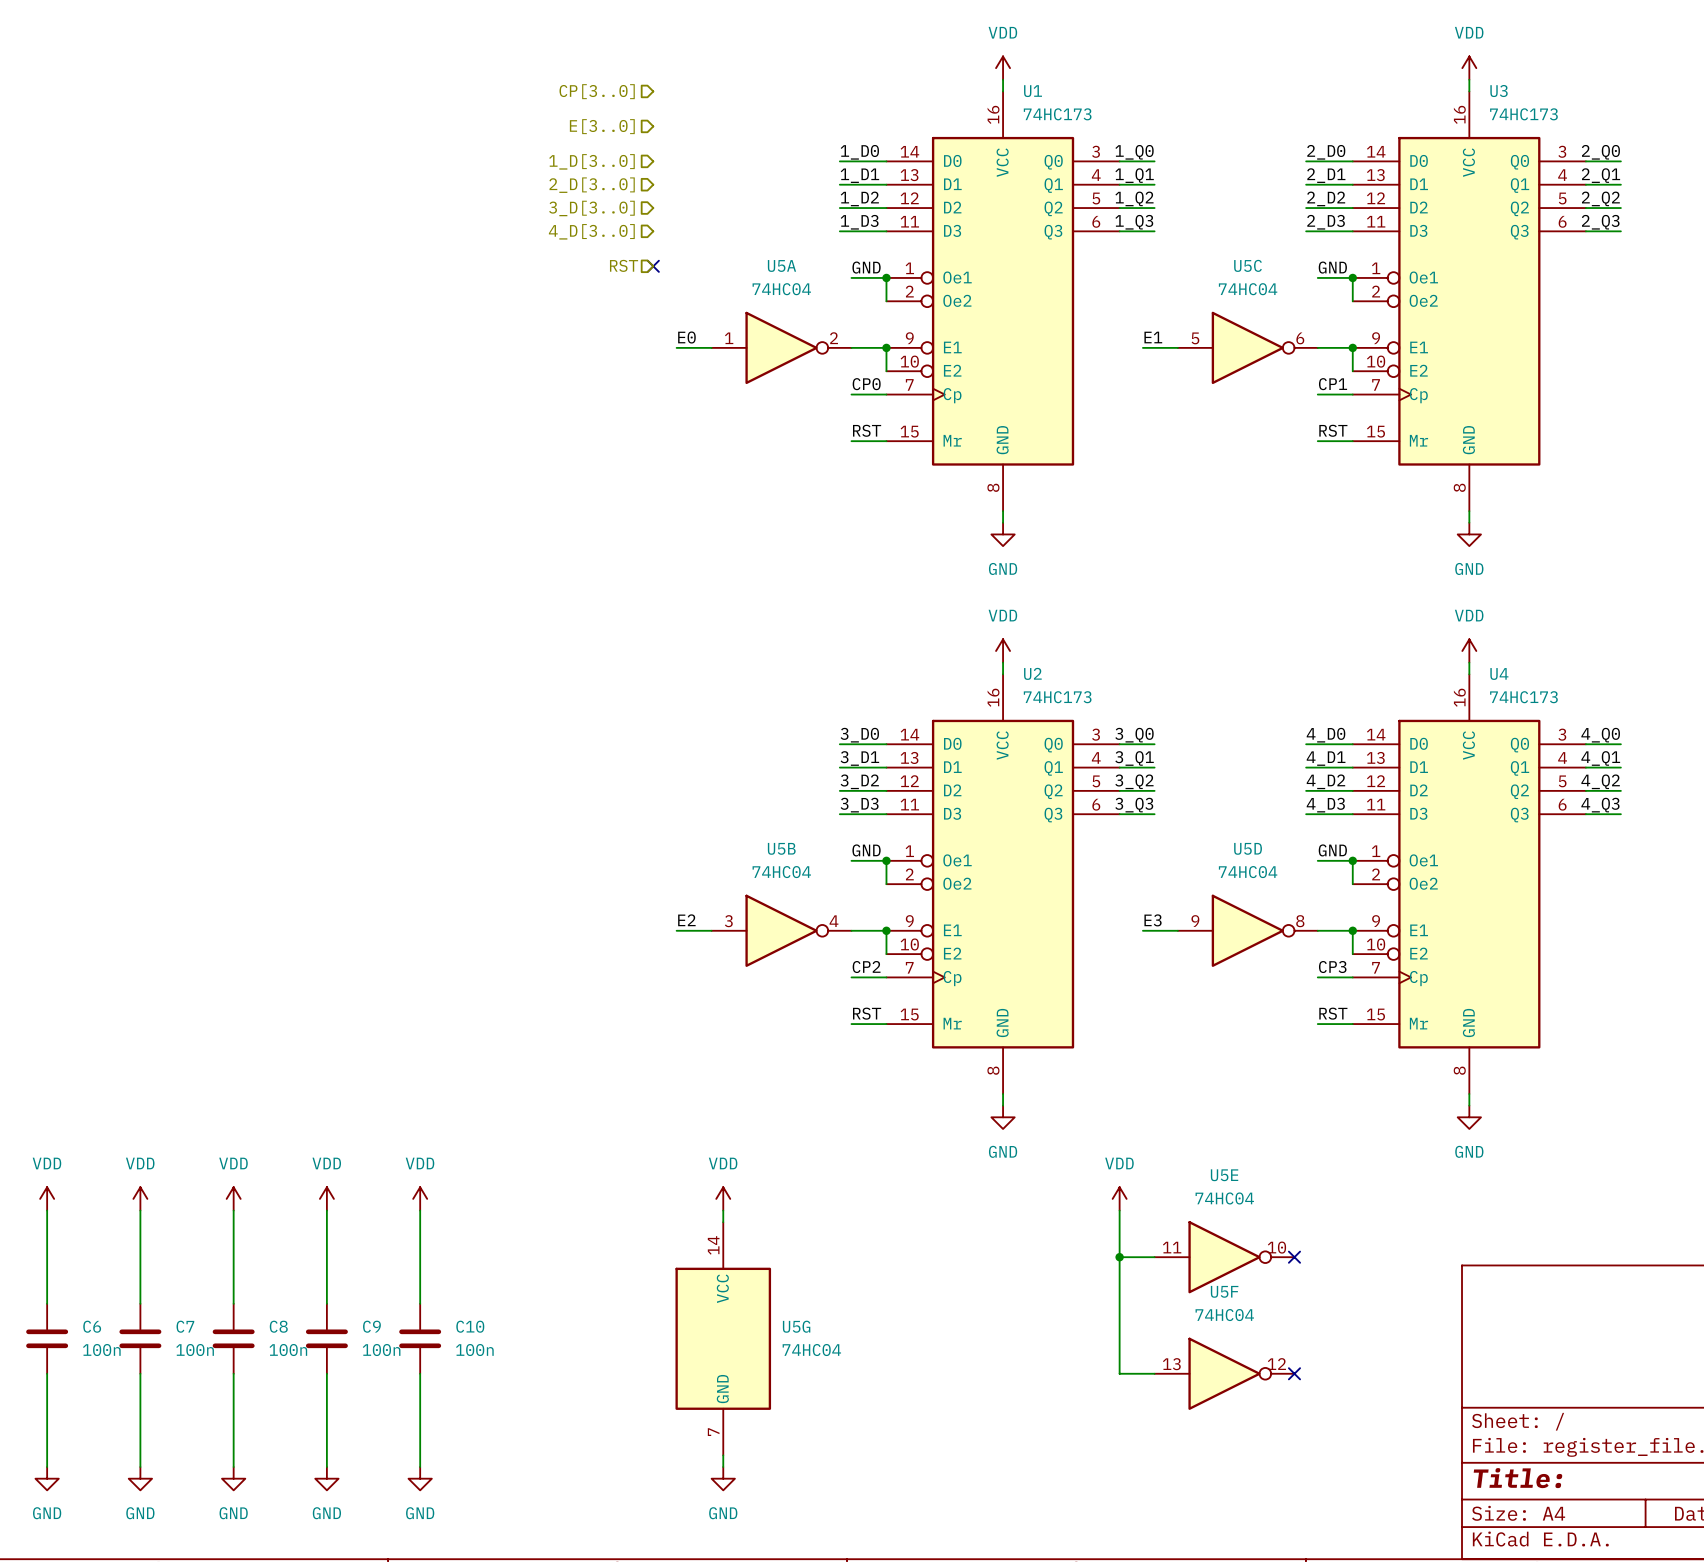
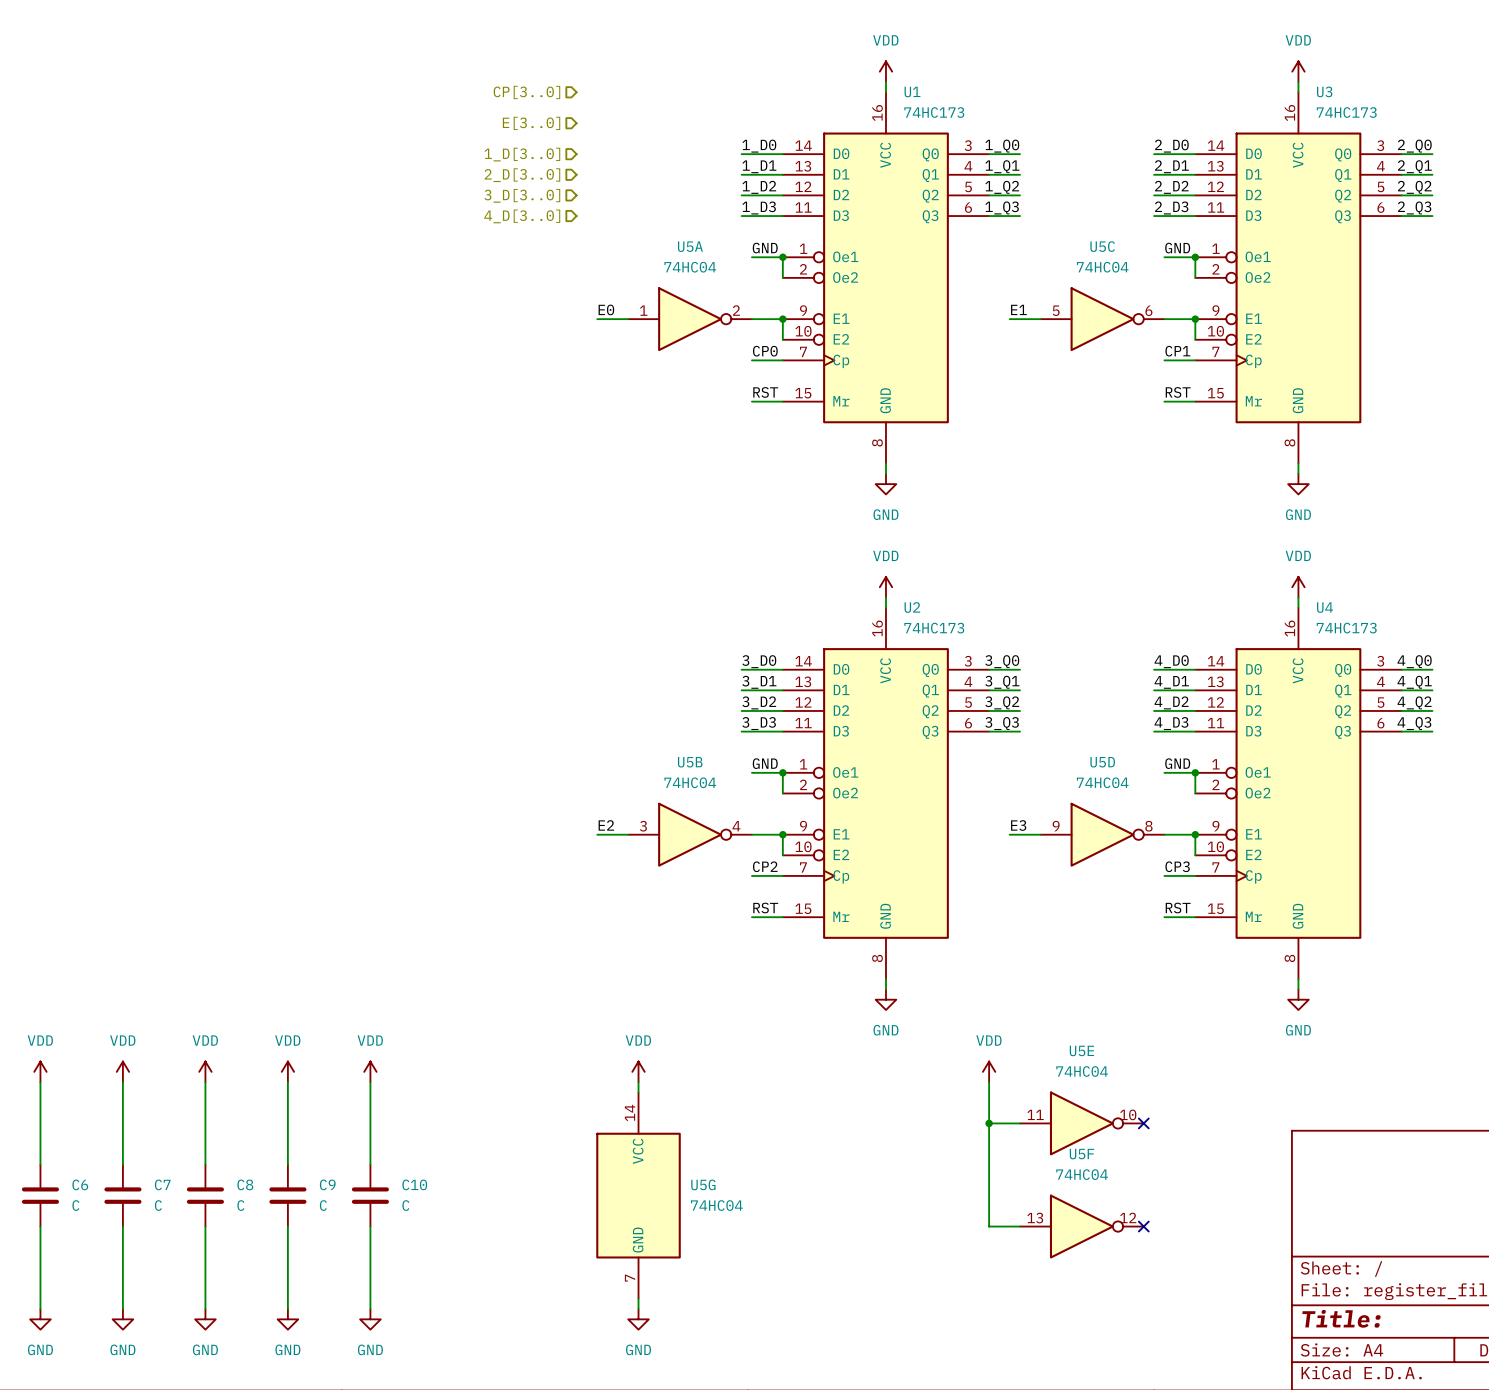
hierarchical label: RST (624, 265) -> none
no-connect mark: (653, 266) -> none
C6 value: 100n (101, 1350) -> C (75, 1205)
C7 value: 100n (195, 1350) -> C (158, 1205)
C8 value: 100n (288, 1350) -> C (240, 1205)
C9 value: 100n (381, 1350) -> C (323, 1205)
C10 value: 100n (474, 1350) -> C (405, 1205)

